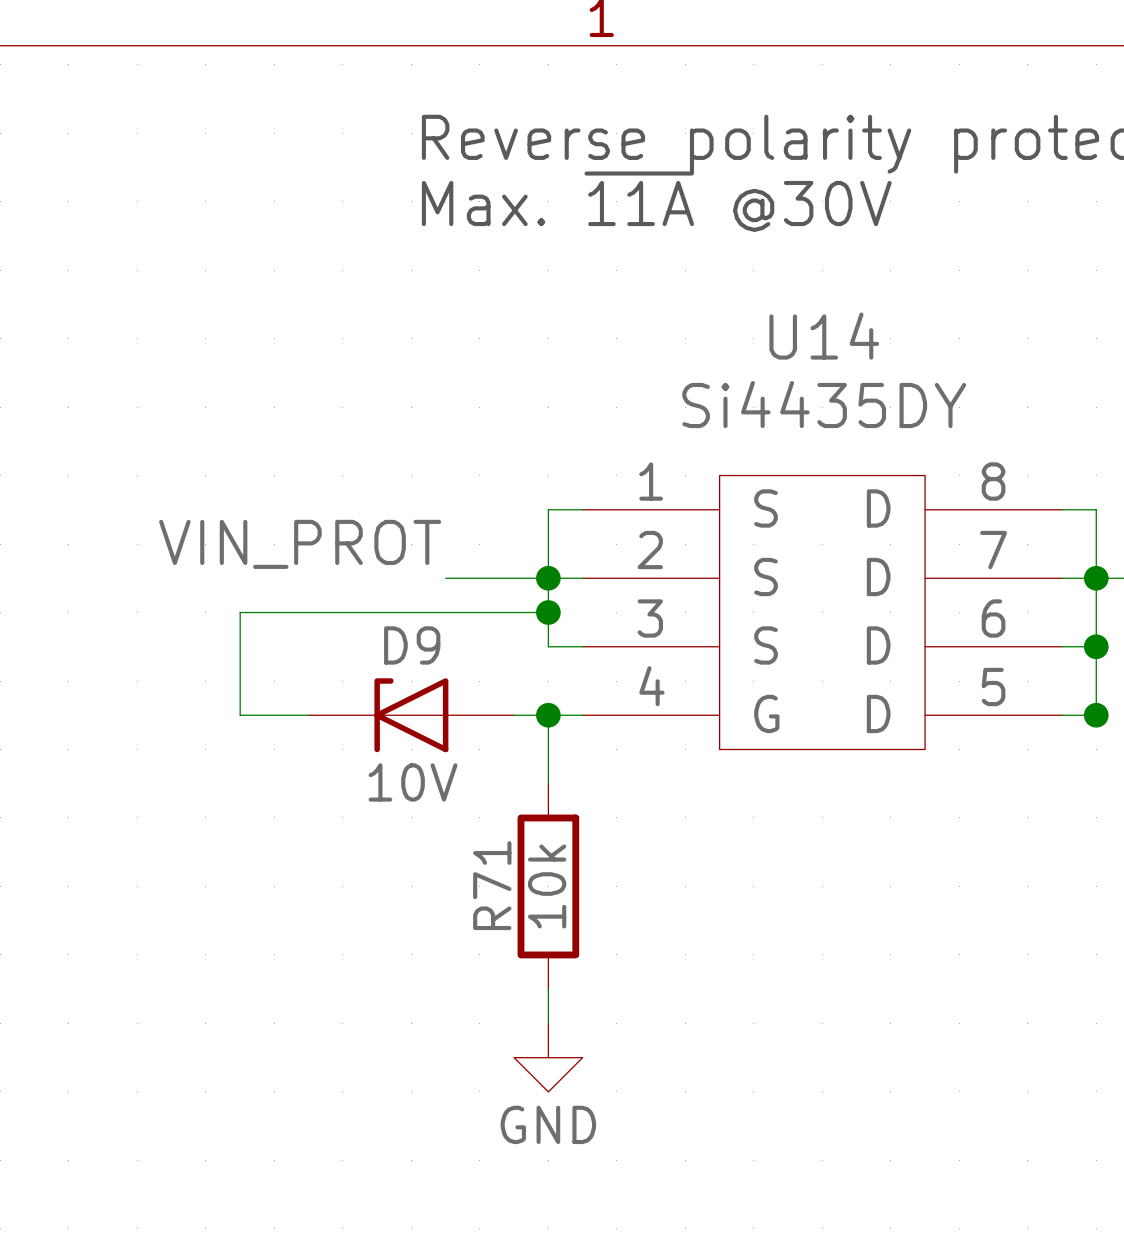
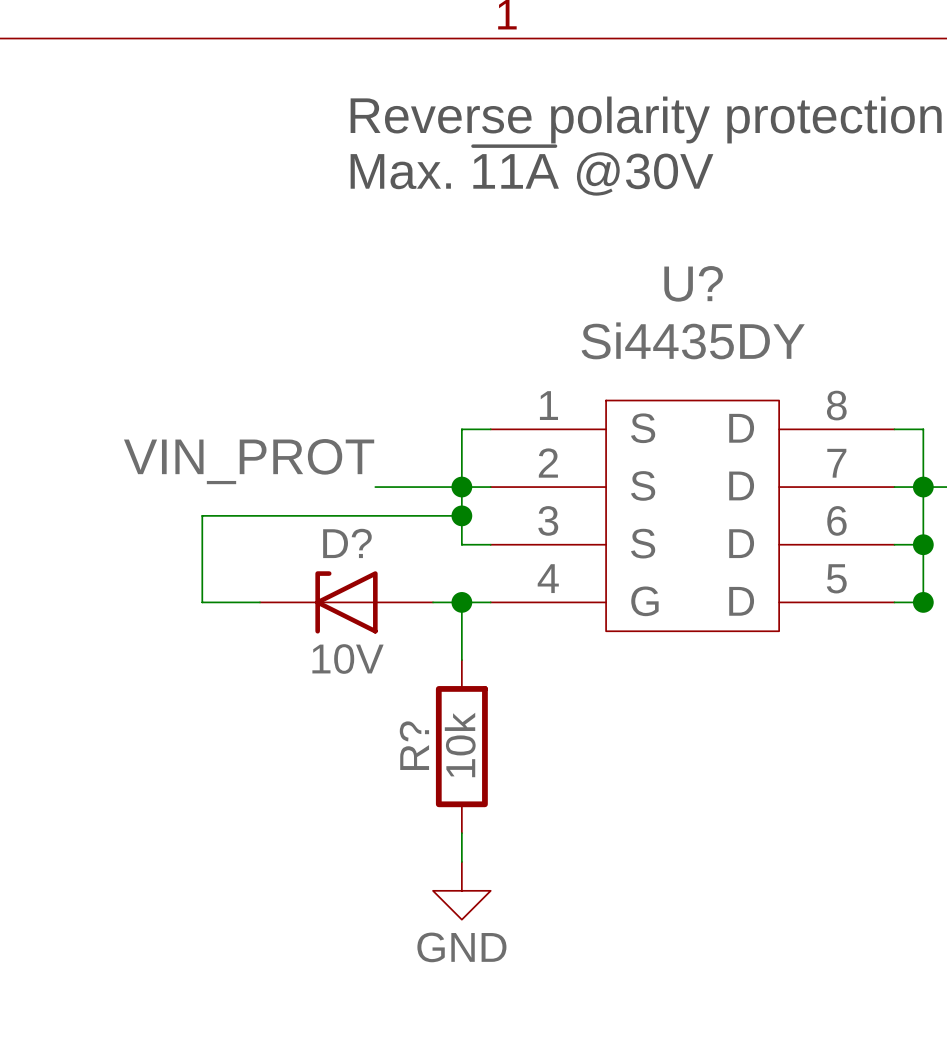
U14 name: U14 (824, 336) -> U? (693, 283)
D9 name: D9 (412, 645) -> D? (347, 543)
R71 name: R71 (492, 885) -> R? (414, 745)

